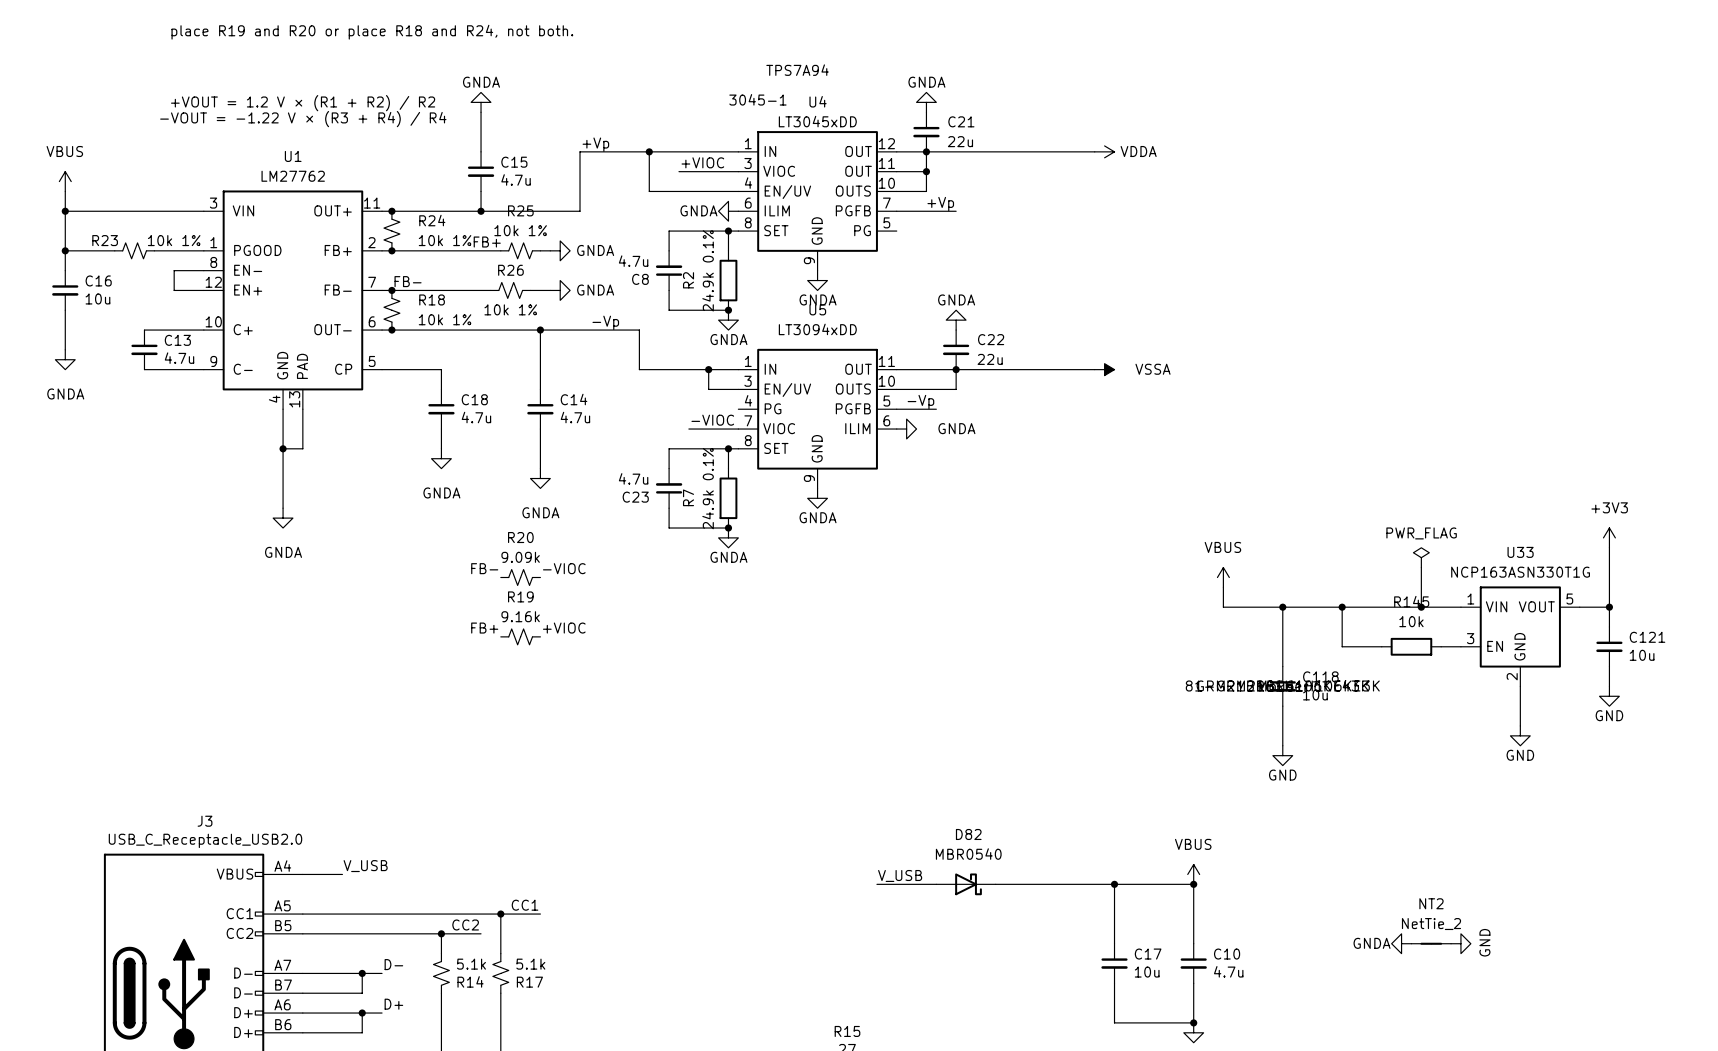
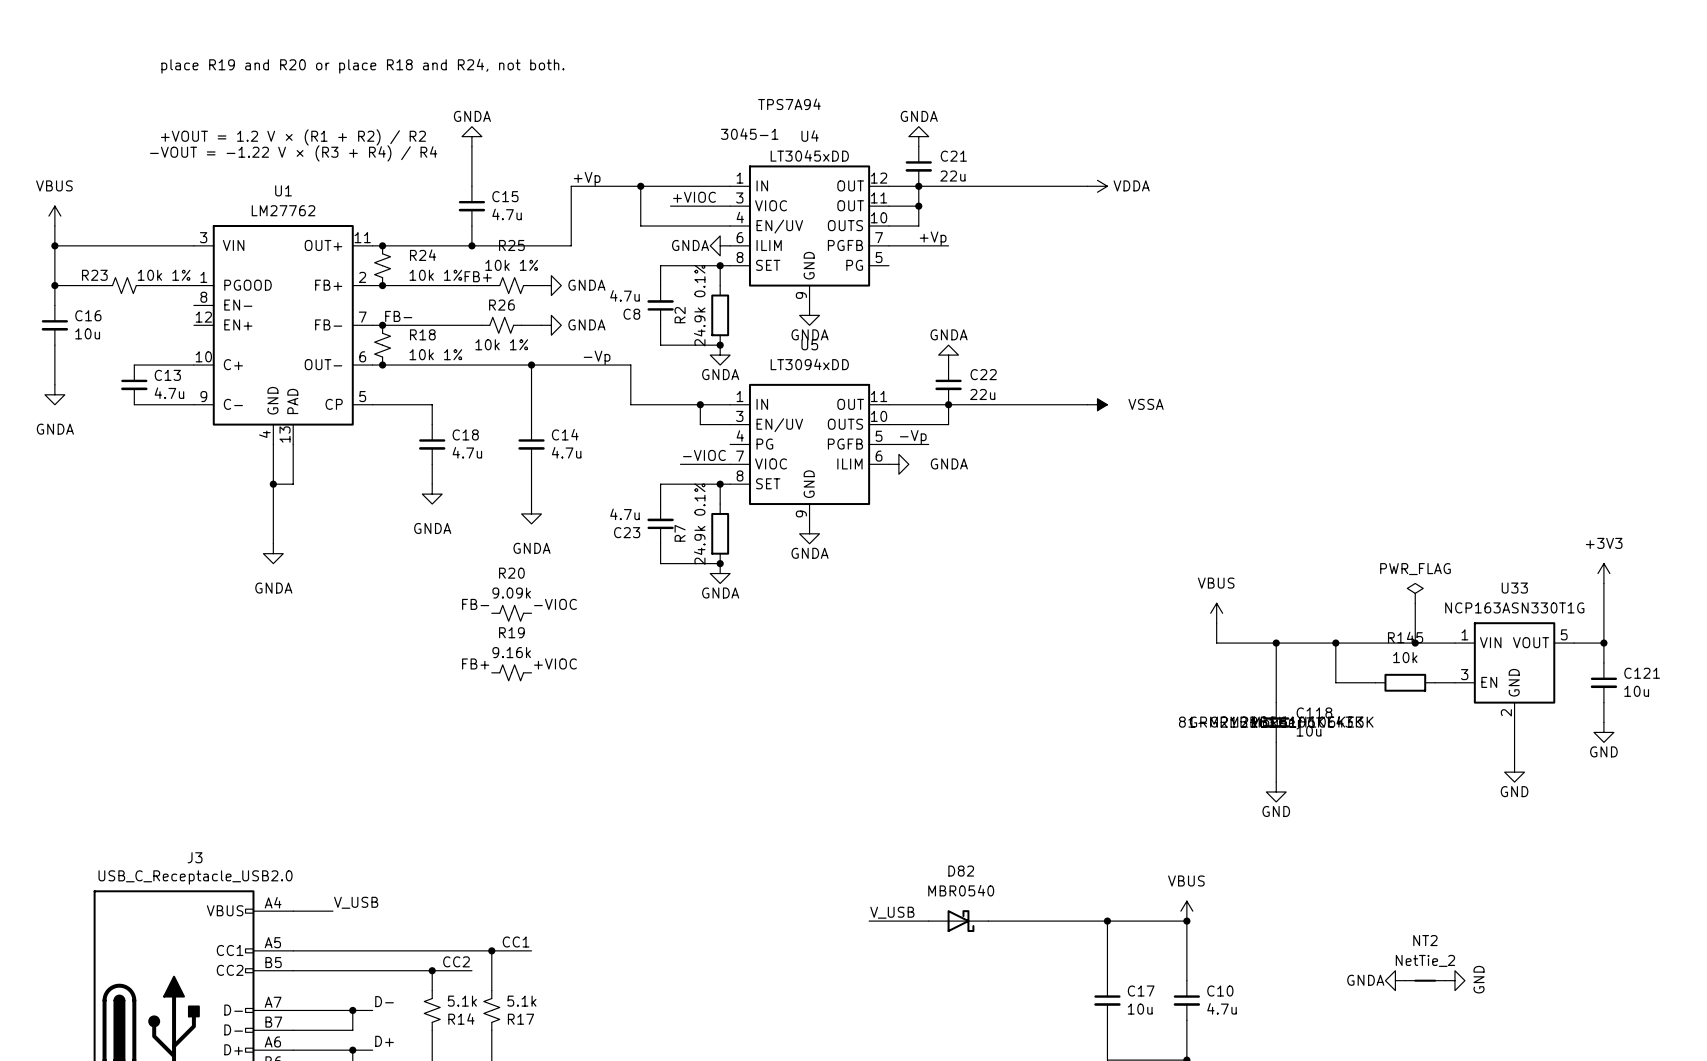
wire: (203, 270) (174, 270) (174, 290) (203, 290) -> none

